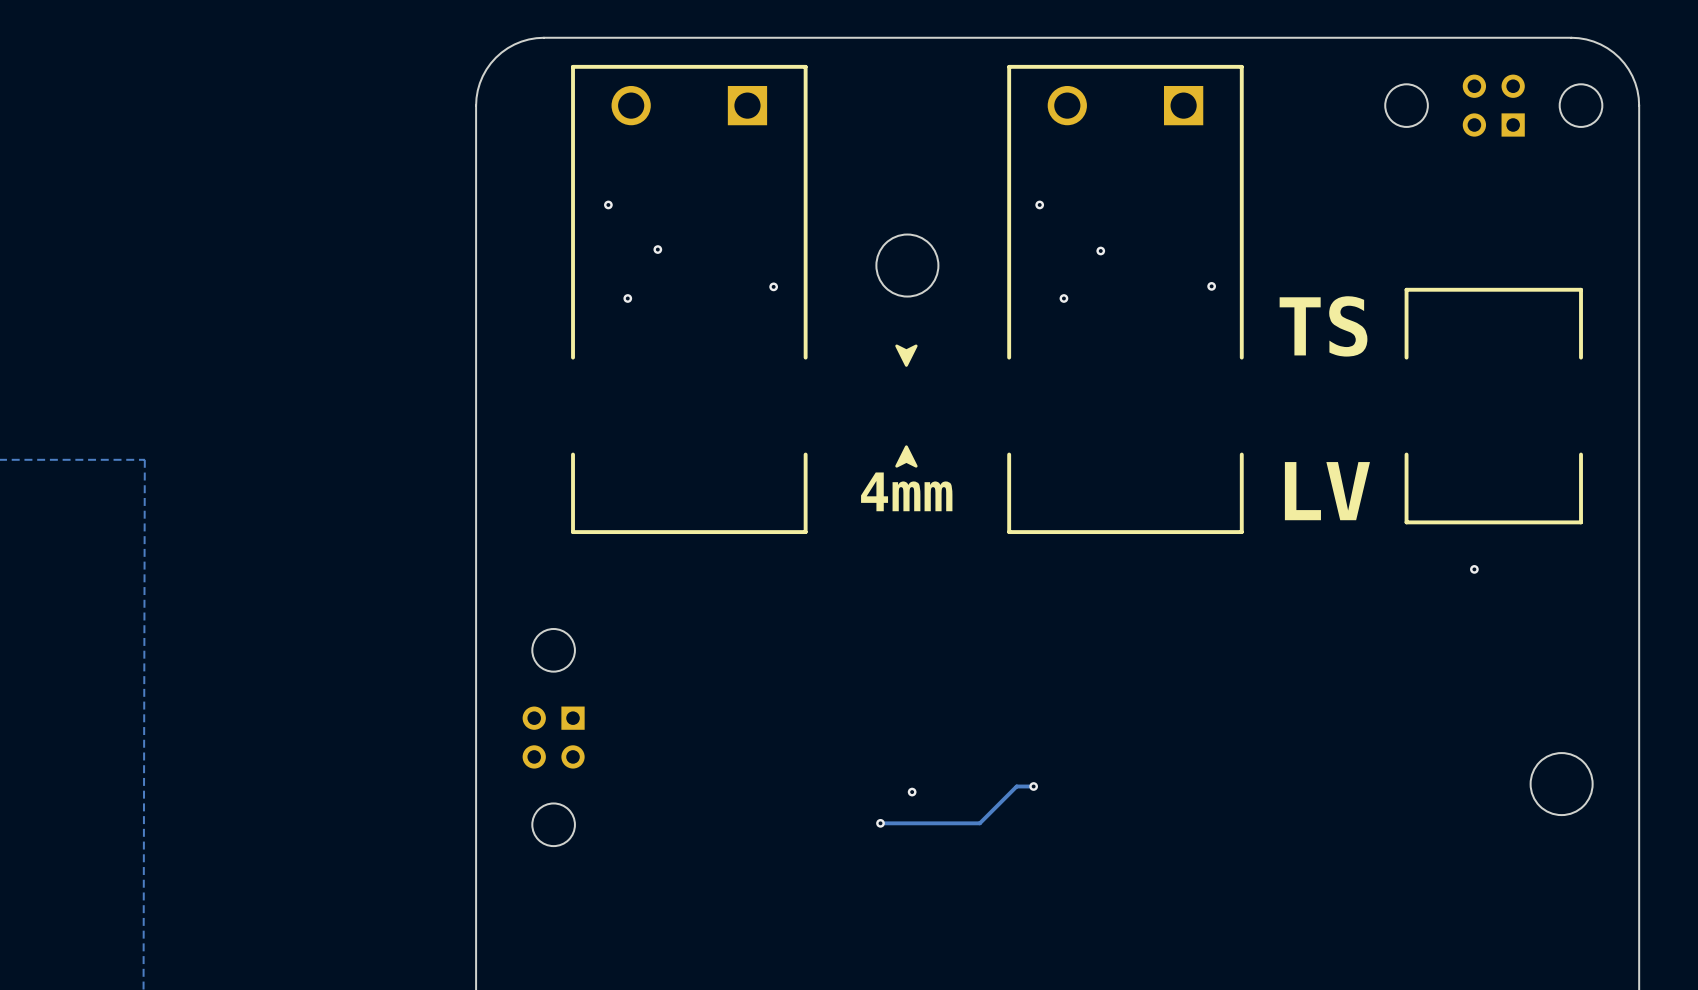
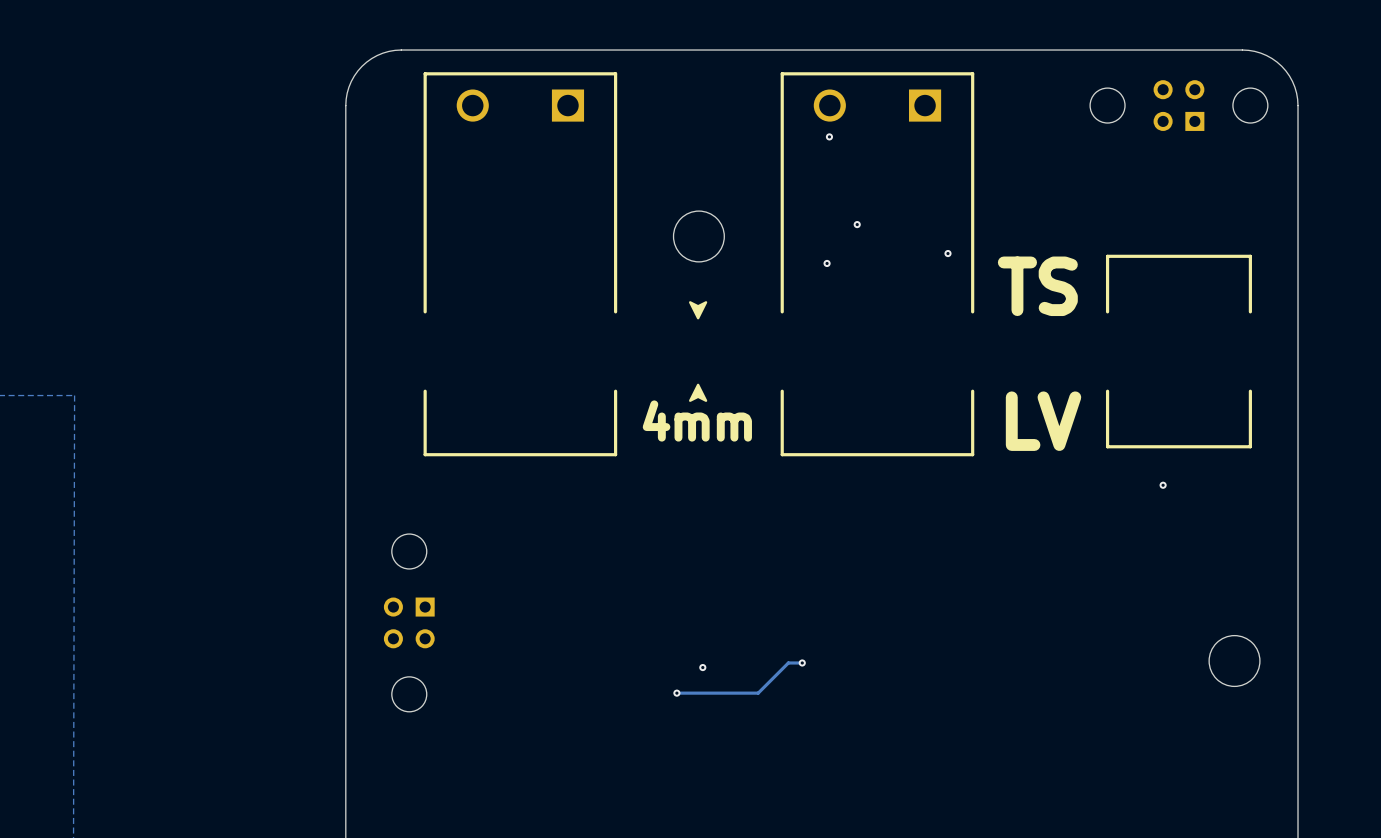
via: (608, 204) -> none
via position: (1039, 204) -> (829, 136)
via: (657, 249) -> none
via: (773, 286) -> none
via: (627, 298) -> none

